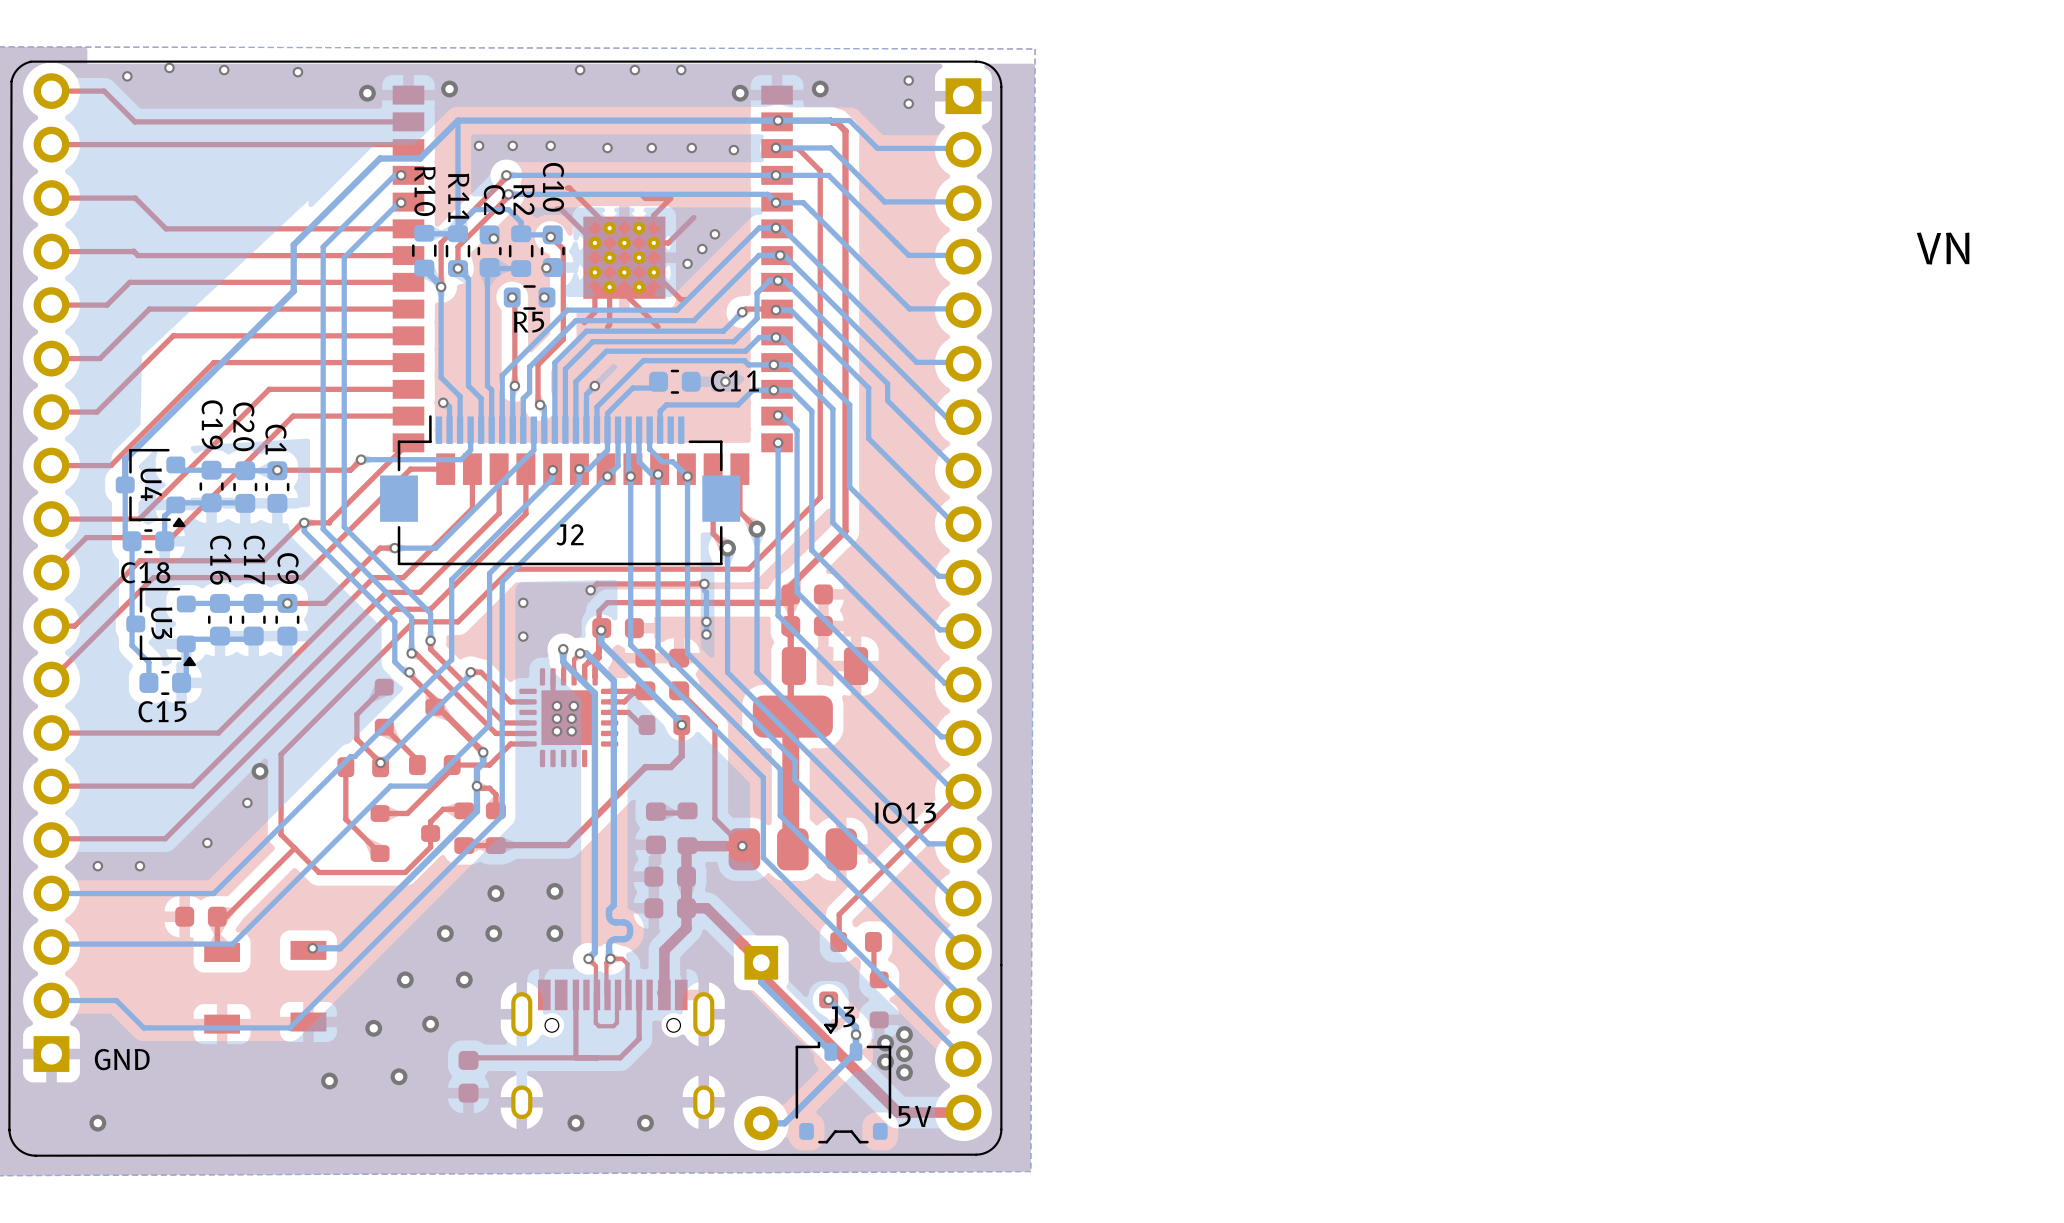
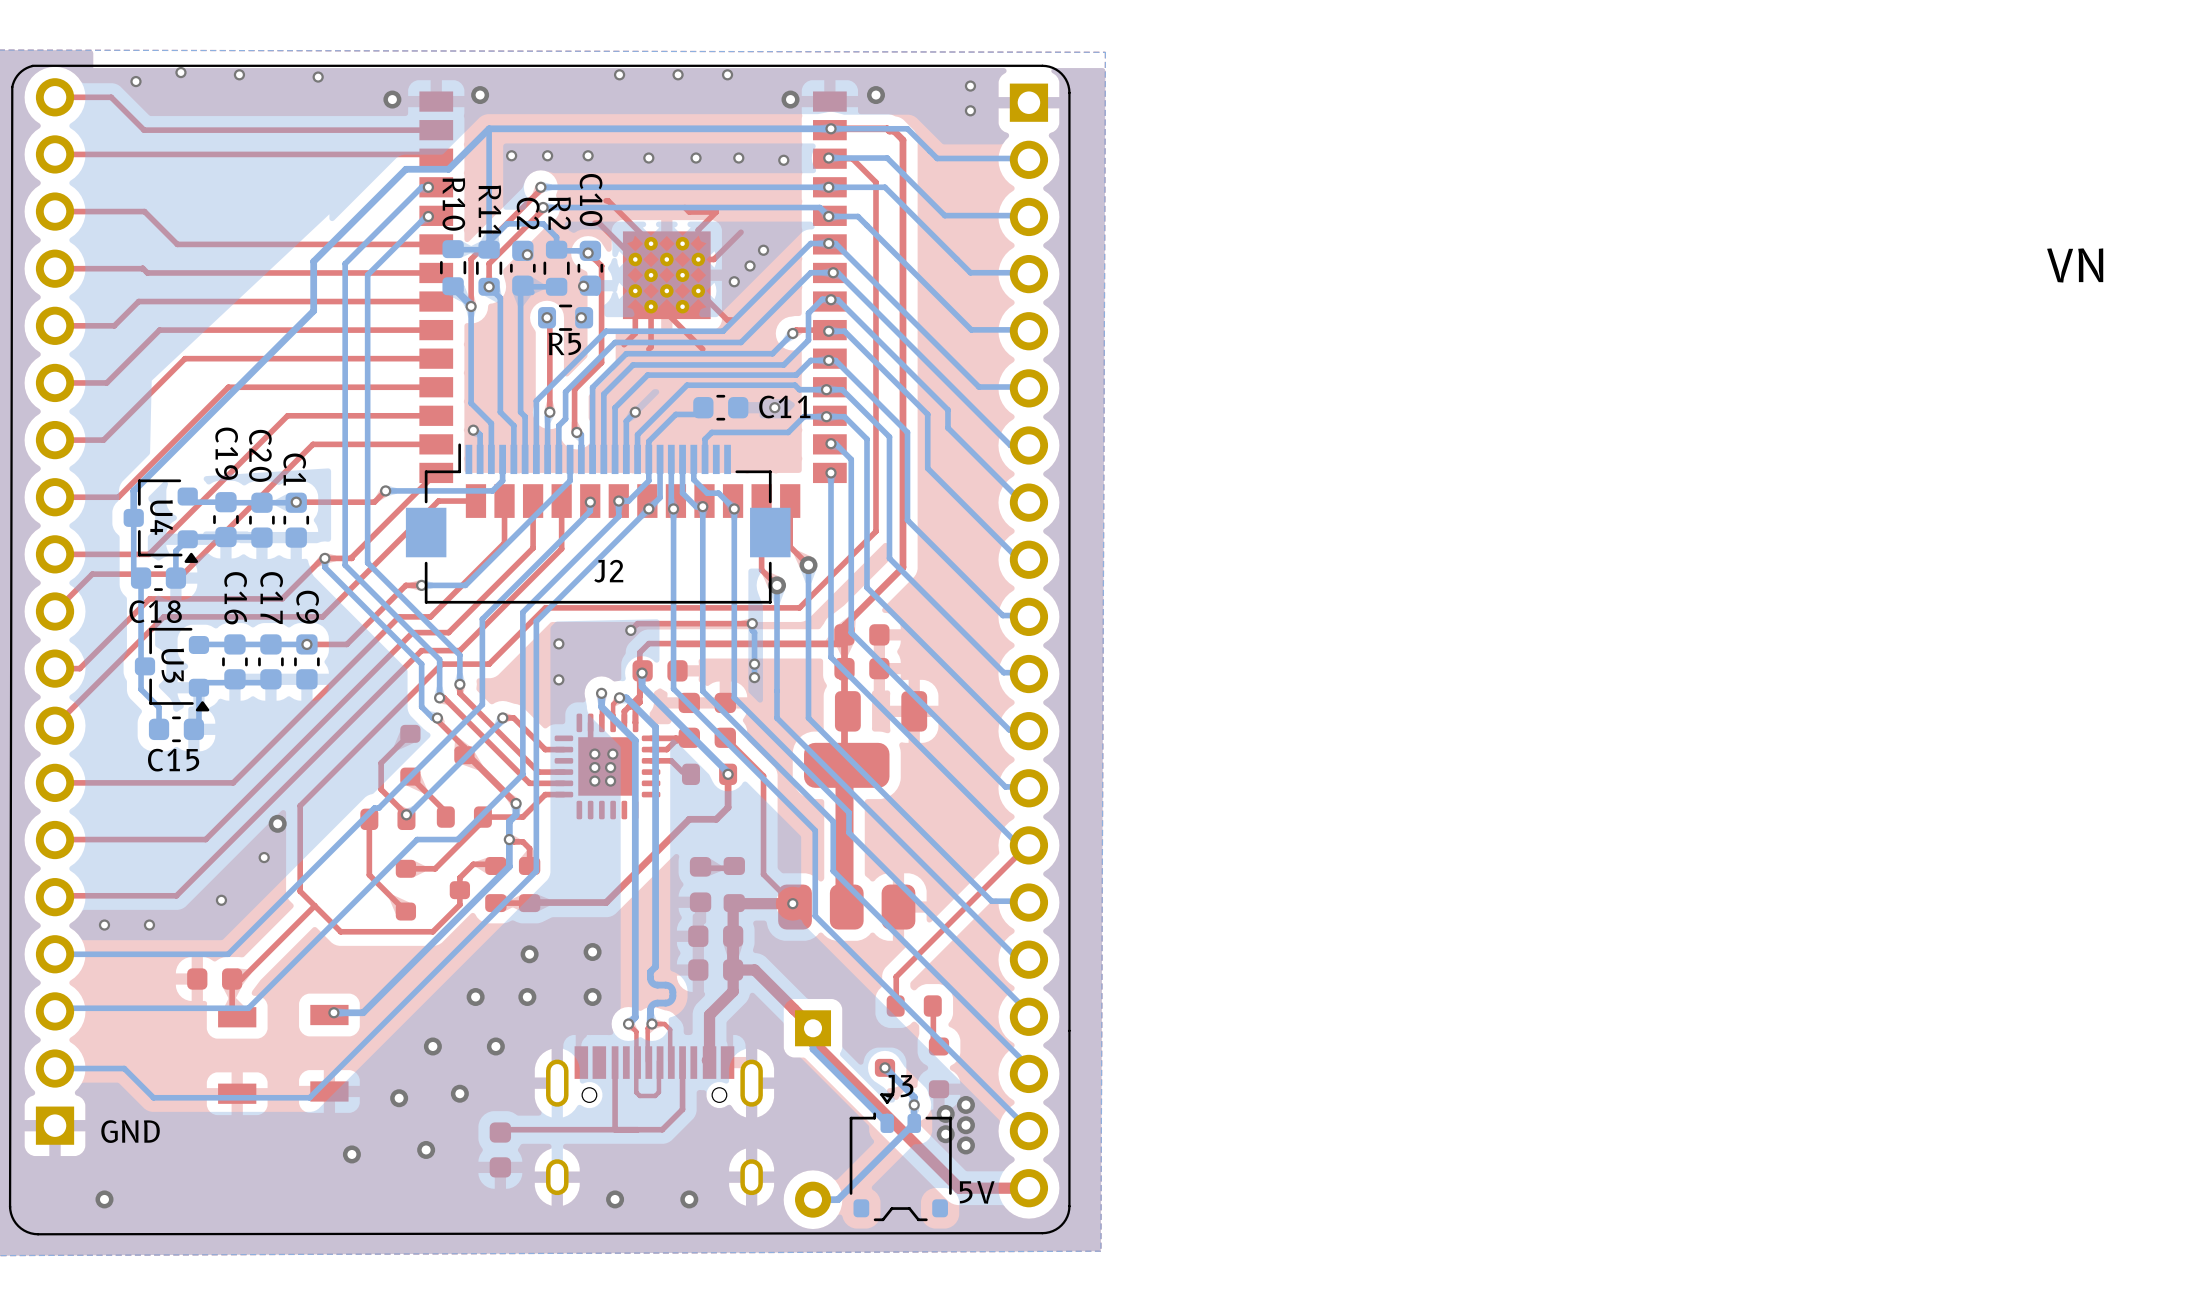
text: IO13 (905, 813) -> none

